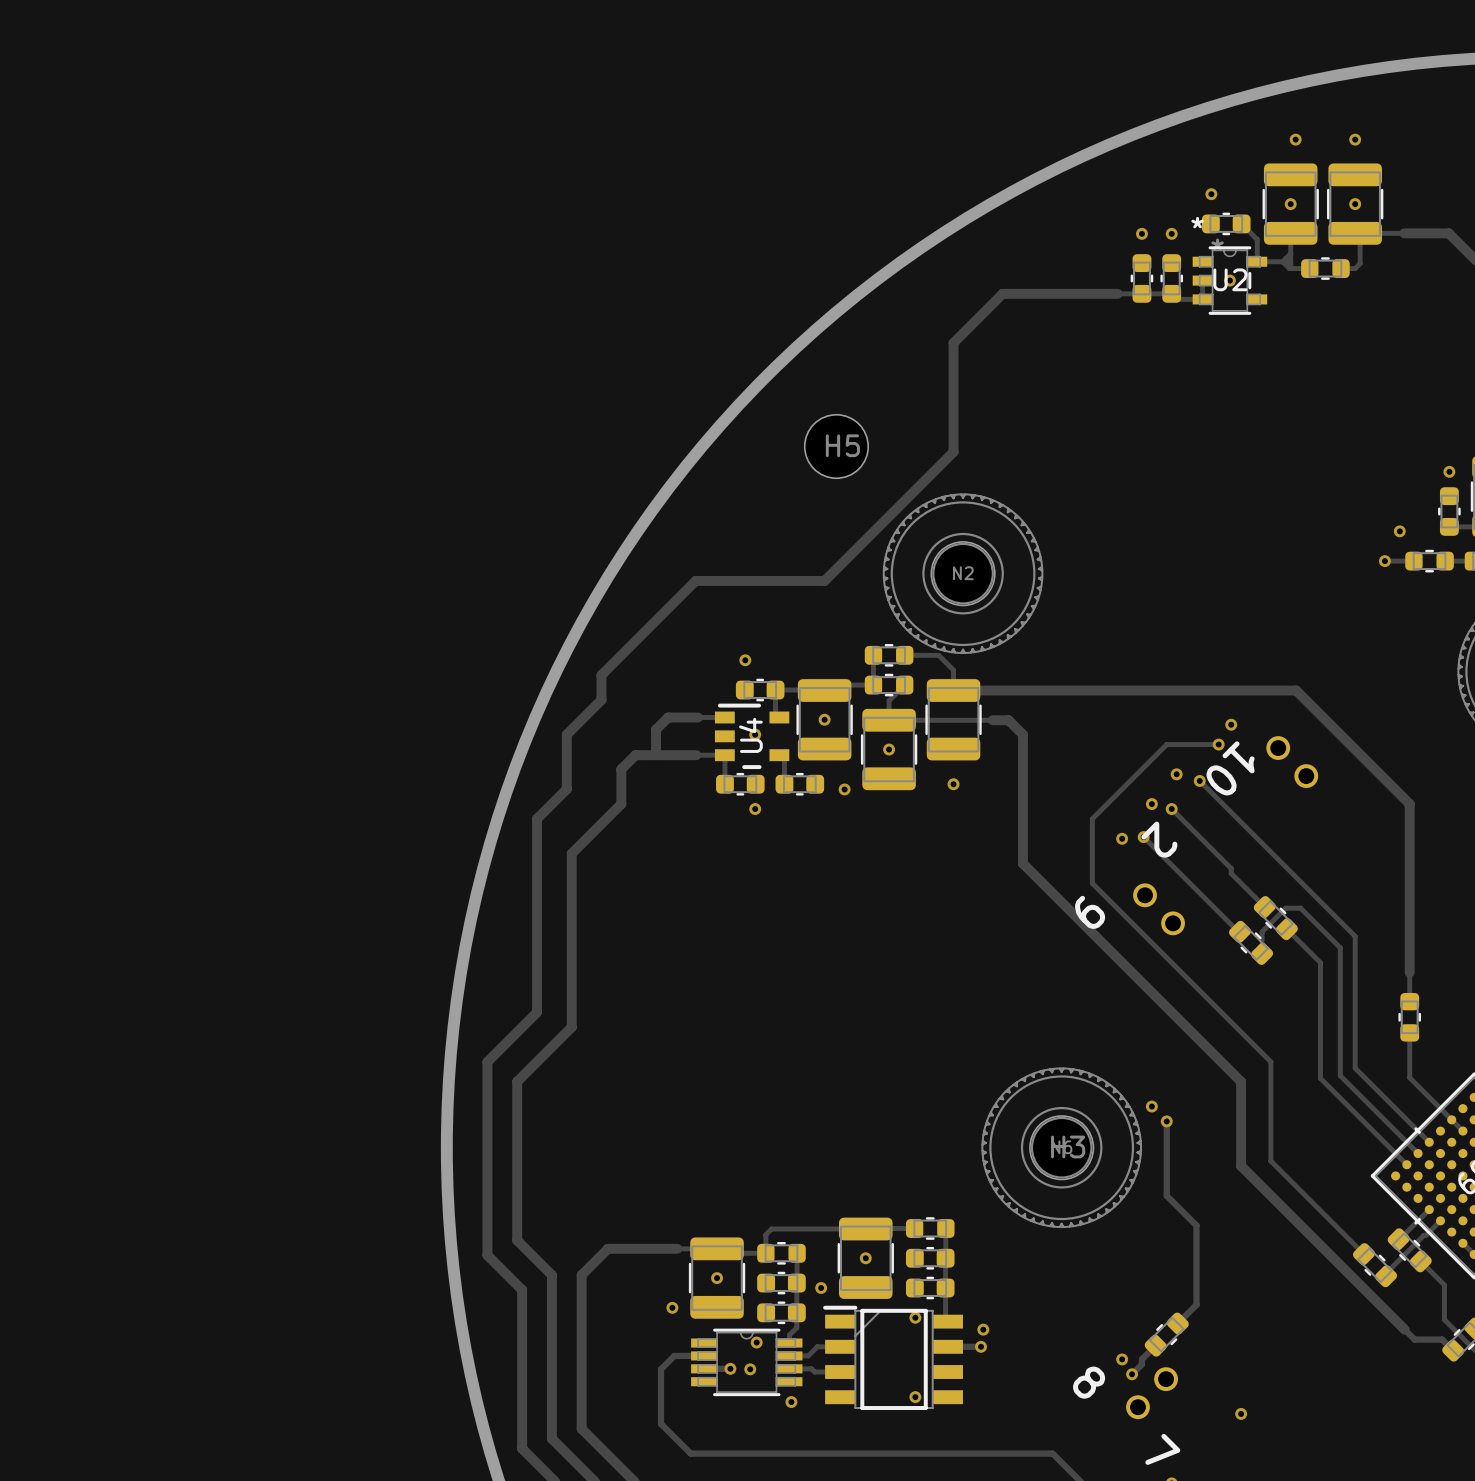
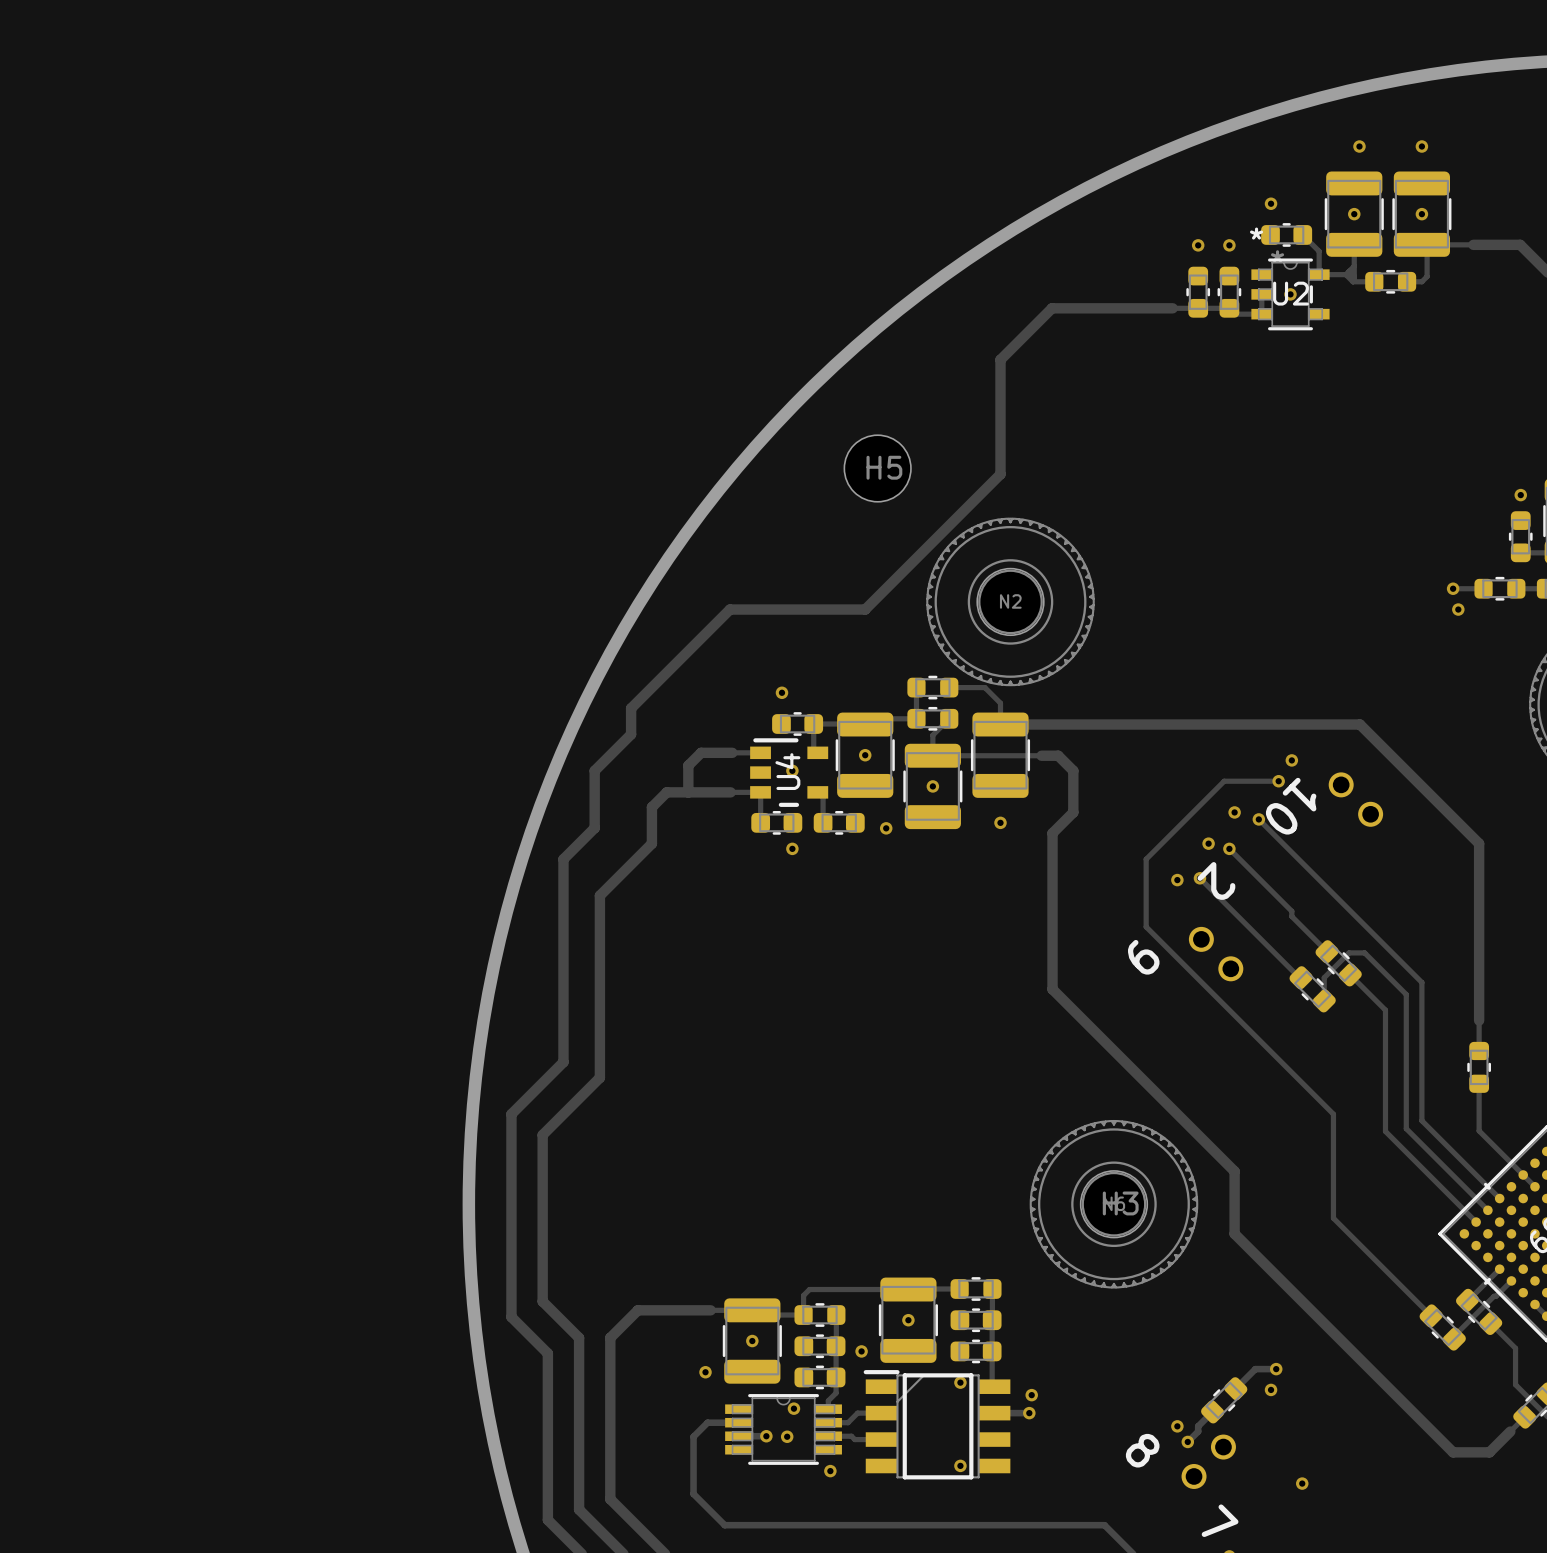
via position: (1399, 531) -> (1458, 609)
track: (1022, 774) (1022, 863) (1241, 1081) (1241, 1166) (1414, 1339) (1442, 1339) (1453, 1350) -> (1073, 812) (1052, 833) (1052, 989) (1234, 1171) (1234, 1233) (1453, 1452) (1489, 1452) (1524, 1417)
via: (1151, 1106) -> none
track: (1166, 1121) (1166, 1195) (1196, 1225) (1196, 1304) -> (1276, 1369) (1255, 1369)
via: (1166, 1121) -> none
via: none -> (1276, 1369)
via: none -> (1271, 1389)

